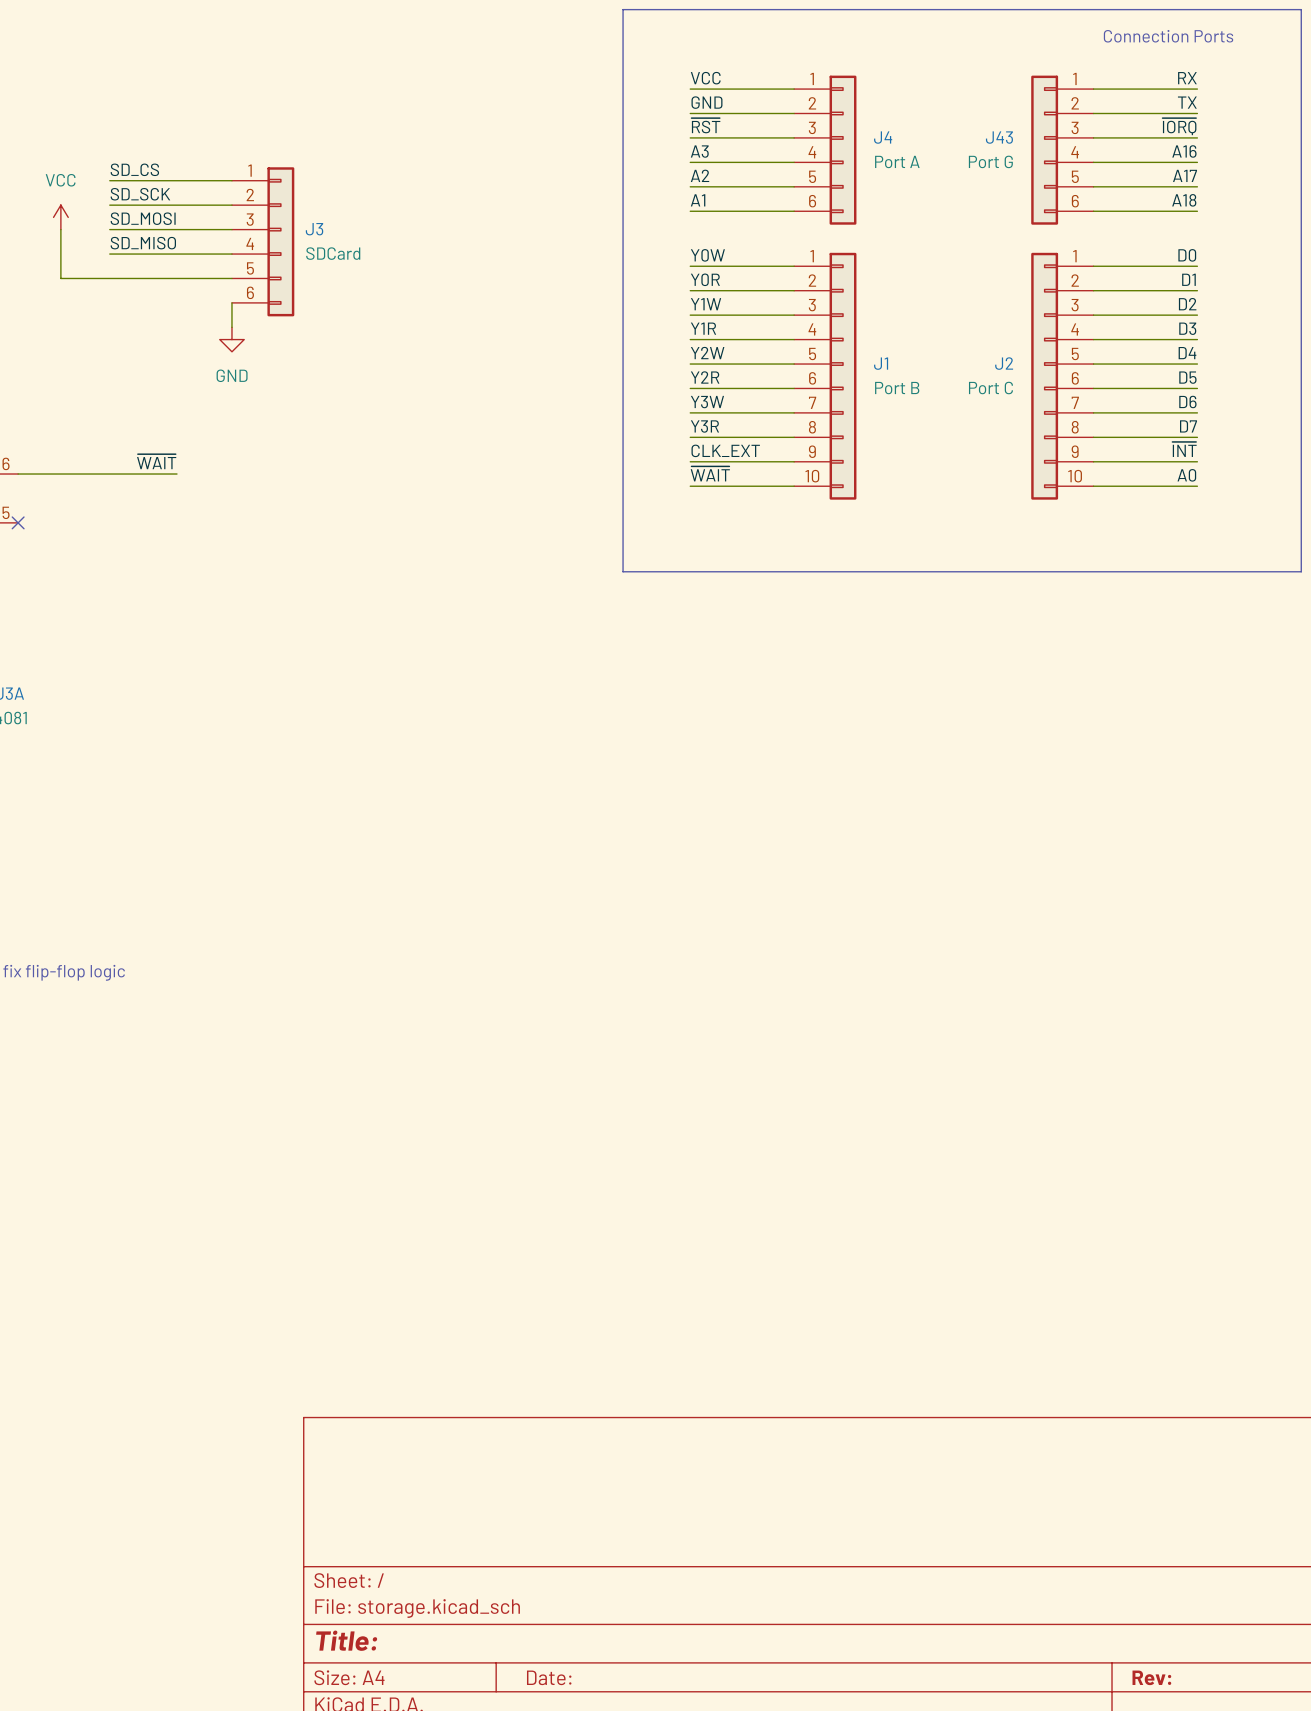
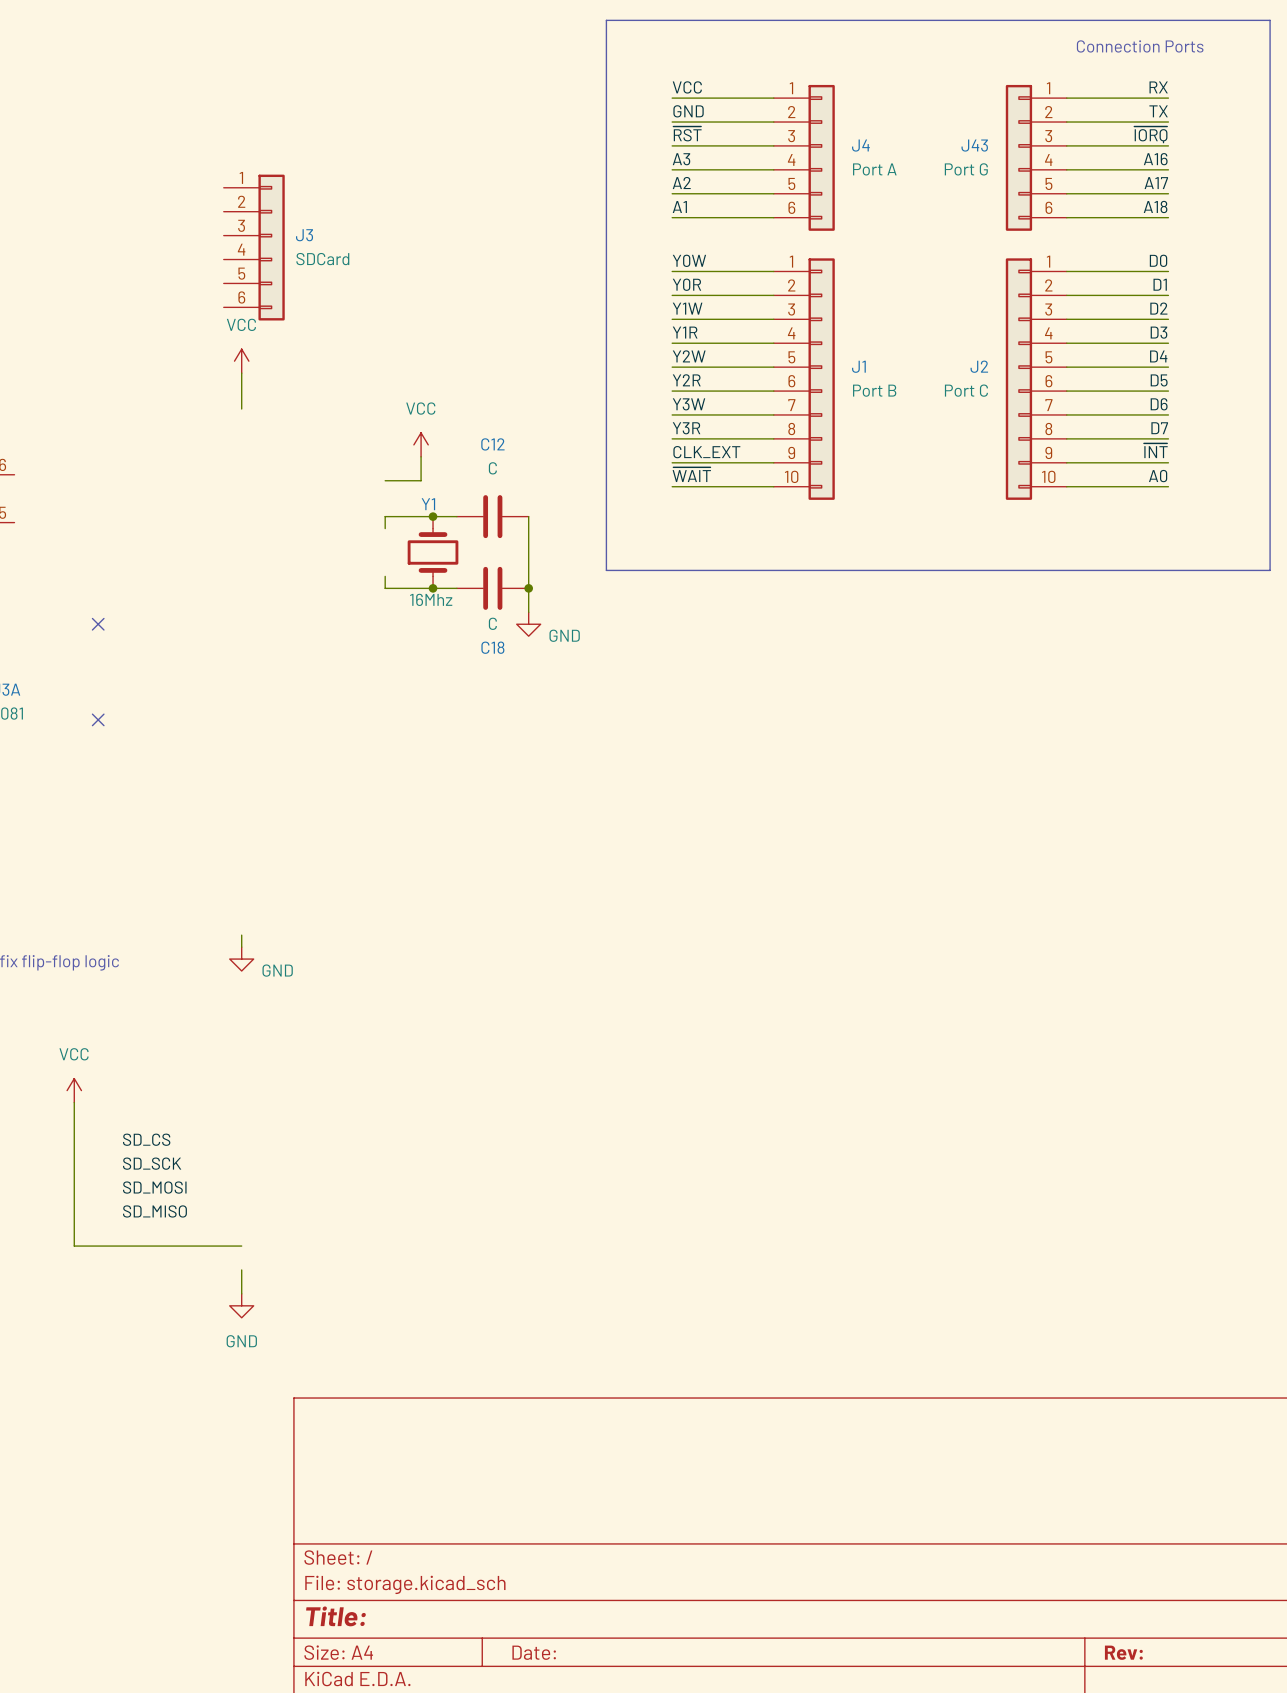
label: SD_CS (134, 169) -> none
wire: (109, 180) (231, 180) -> none
label: SD_SCK (140, 194) -> none
wire: (109, 205) (231, 205) -> none
power symbol: VCC (60, 217) -> none
label: SD_MOSI (143, 218) -> none
wire: (60, 229) (60, 278) (231, 278) -> none
wire: (109, 229) (231, 229) -> none
label: SD_MISO (143, 243) -> none
wire: (109, 254) (231, 254) -> none
wire: (231, 302) (231, 327) -> none
power symbol: GND (231, 339) -> none
power symbol: none -> VCC (241, 361)
wire: none -> (241, 373) (241, 409)
power symbol: none -> VCC (421, 444)
wire: none -> (421, 456) (421, 480) (385, 480)
label: ~{WAIT} (156, 461) -> none
wire: (18, 474) (176, 474) -> none
junction: none -> (433, 516)
wire: none -> (456, 516) (385, 516) (385, 528)
C12: none -> C (492, 516)
wire: none -> (528, 516) (528, 612)
no-connect mark: (18, 522) -> none
Y1: none -> 16Mhz (433, 552)
wire: none -> (385, 576) (385, 588) (456, 588)
junction: none -> (433, 588)
C18: none -> C (492, 588)
junction: none -> (528, 588)
no-connect mark: none -> (98, 624)
power symbol: none -> GND (528, 624)
no-connect mark: none -> (98, 719)
wire: none -> (241, 935) (241, 947)
power symbol: none -> GND (241, 959)
power symbol: none -> VCC (74, 1090)
wire: none -> (74, 1102) (74, 1246) (241, 1246)
label: none -> SD_CS (146, 1139)
label: none -> SD_SCK (152, 1163)
label: none -> SD_MOSI (154, 1187)
label: none -> SD_MISO (154, 1211)
wire: none -> (241, 1269) (241, 1293)
power symbol: none -> GND (241, 1305)

